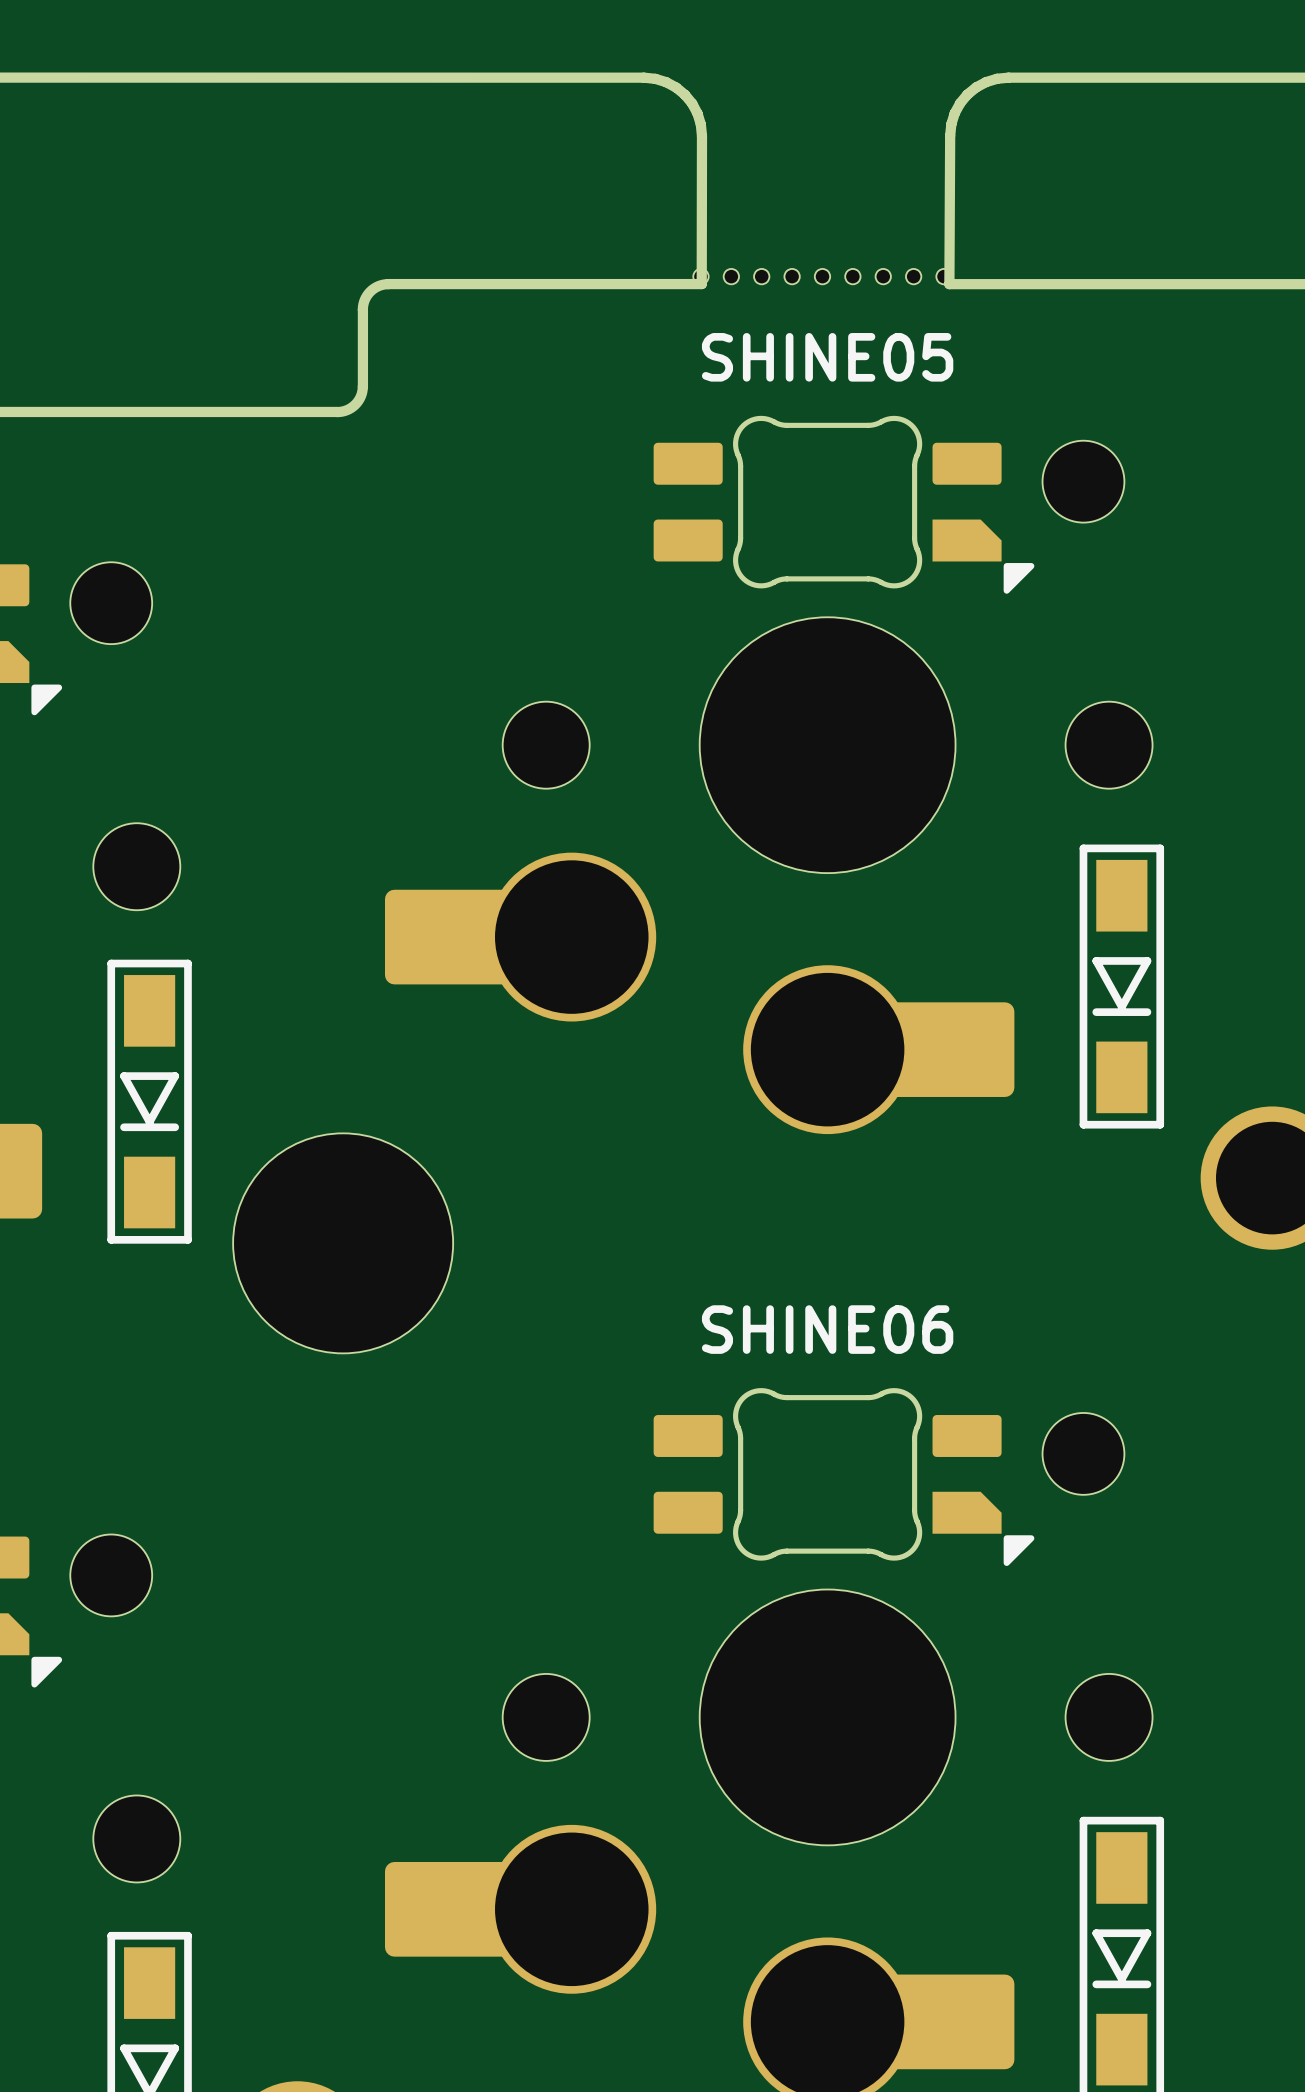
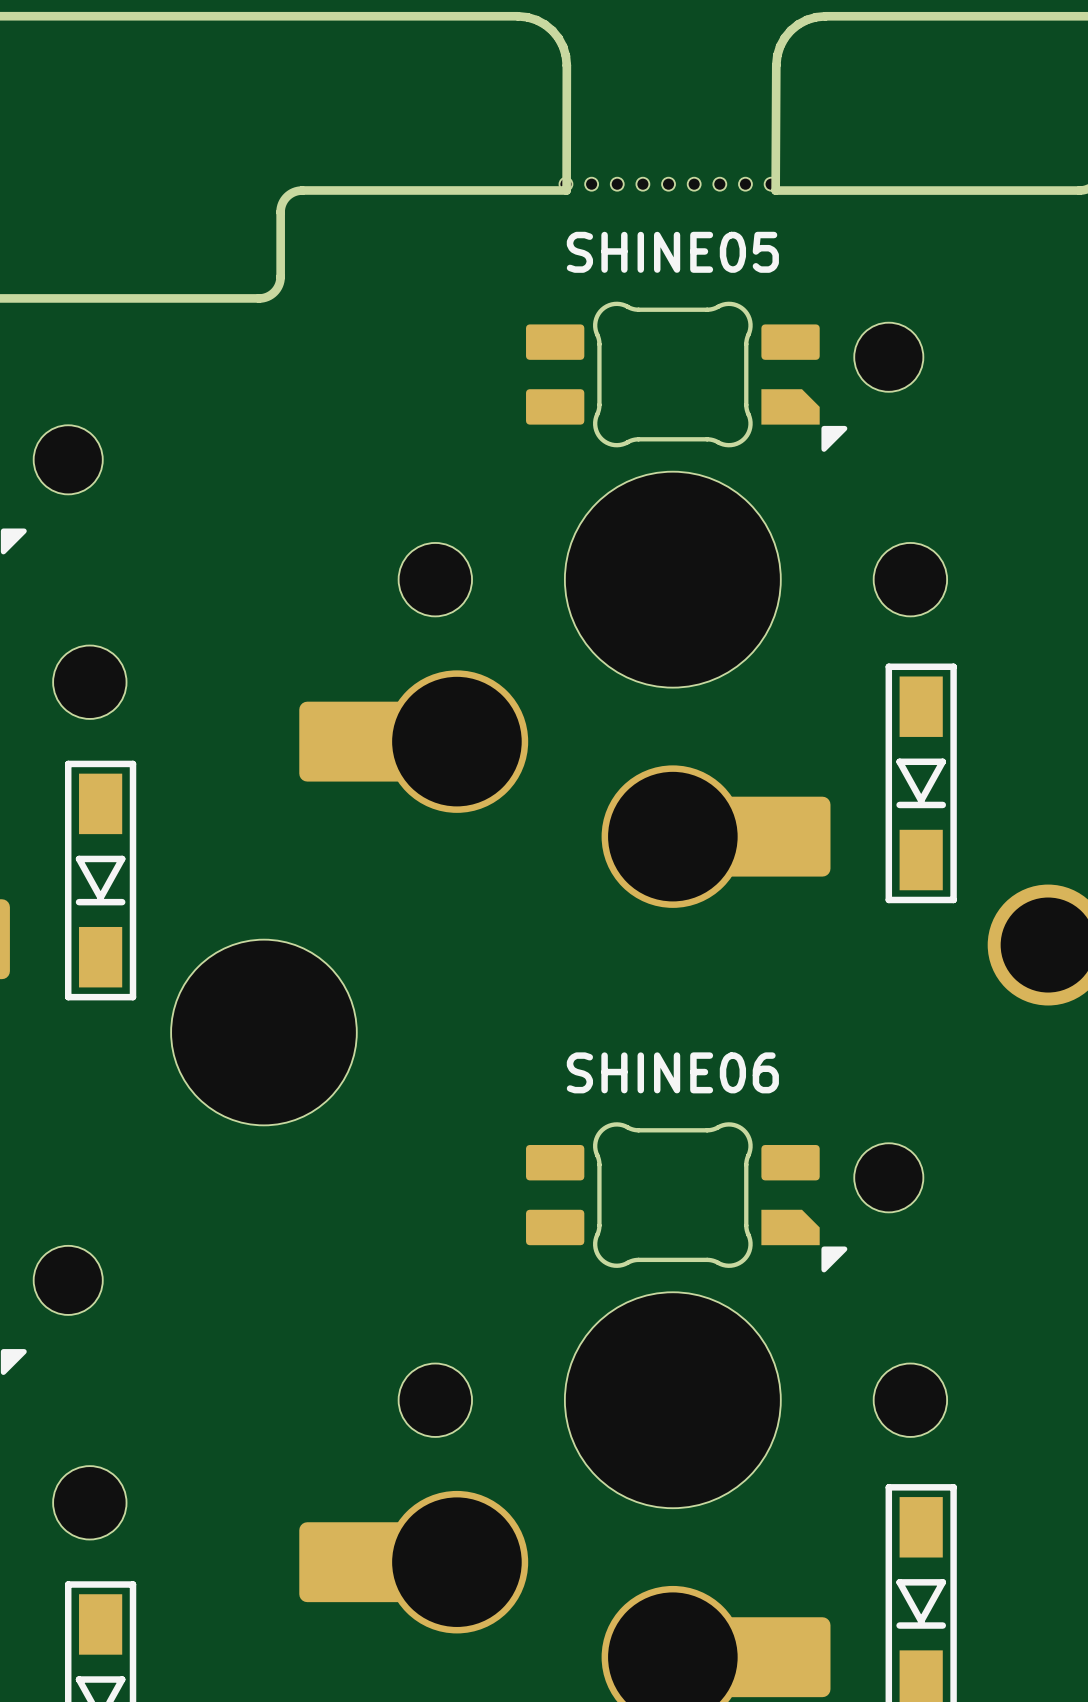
part position: (343, 1243) -> (263, 1032)

